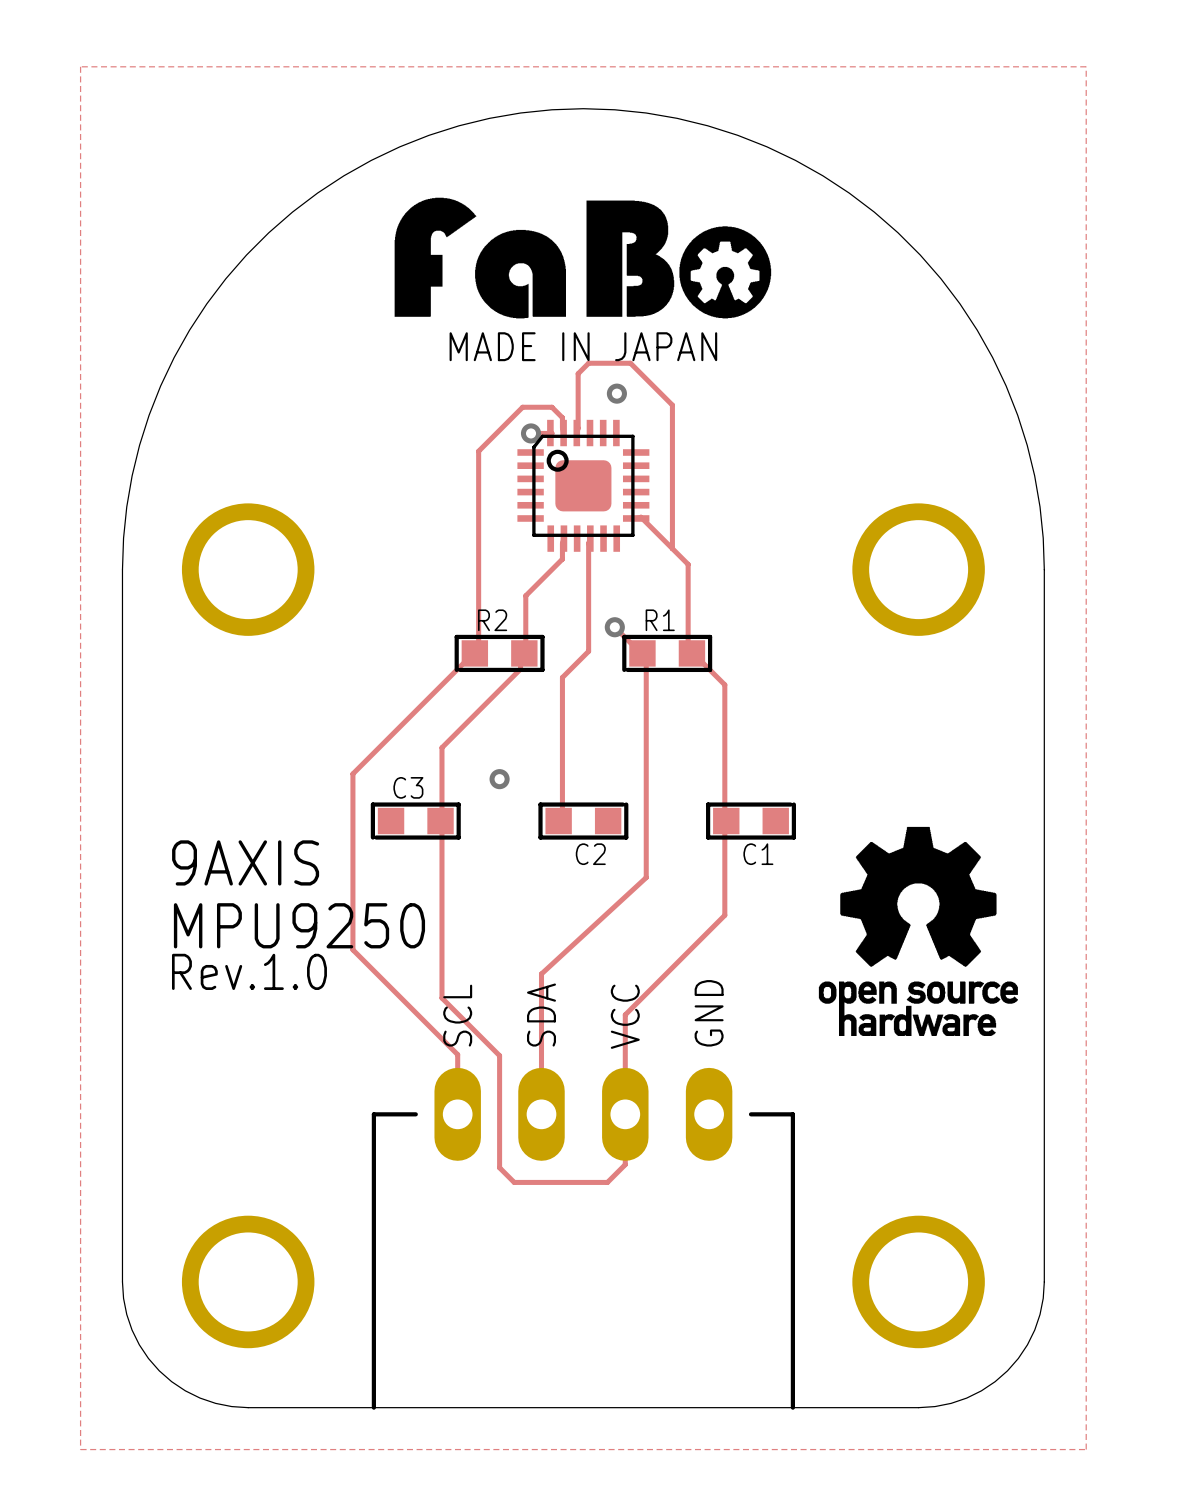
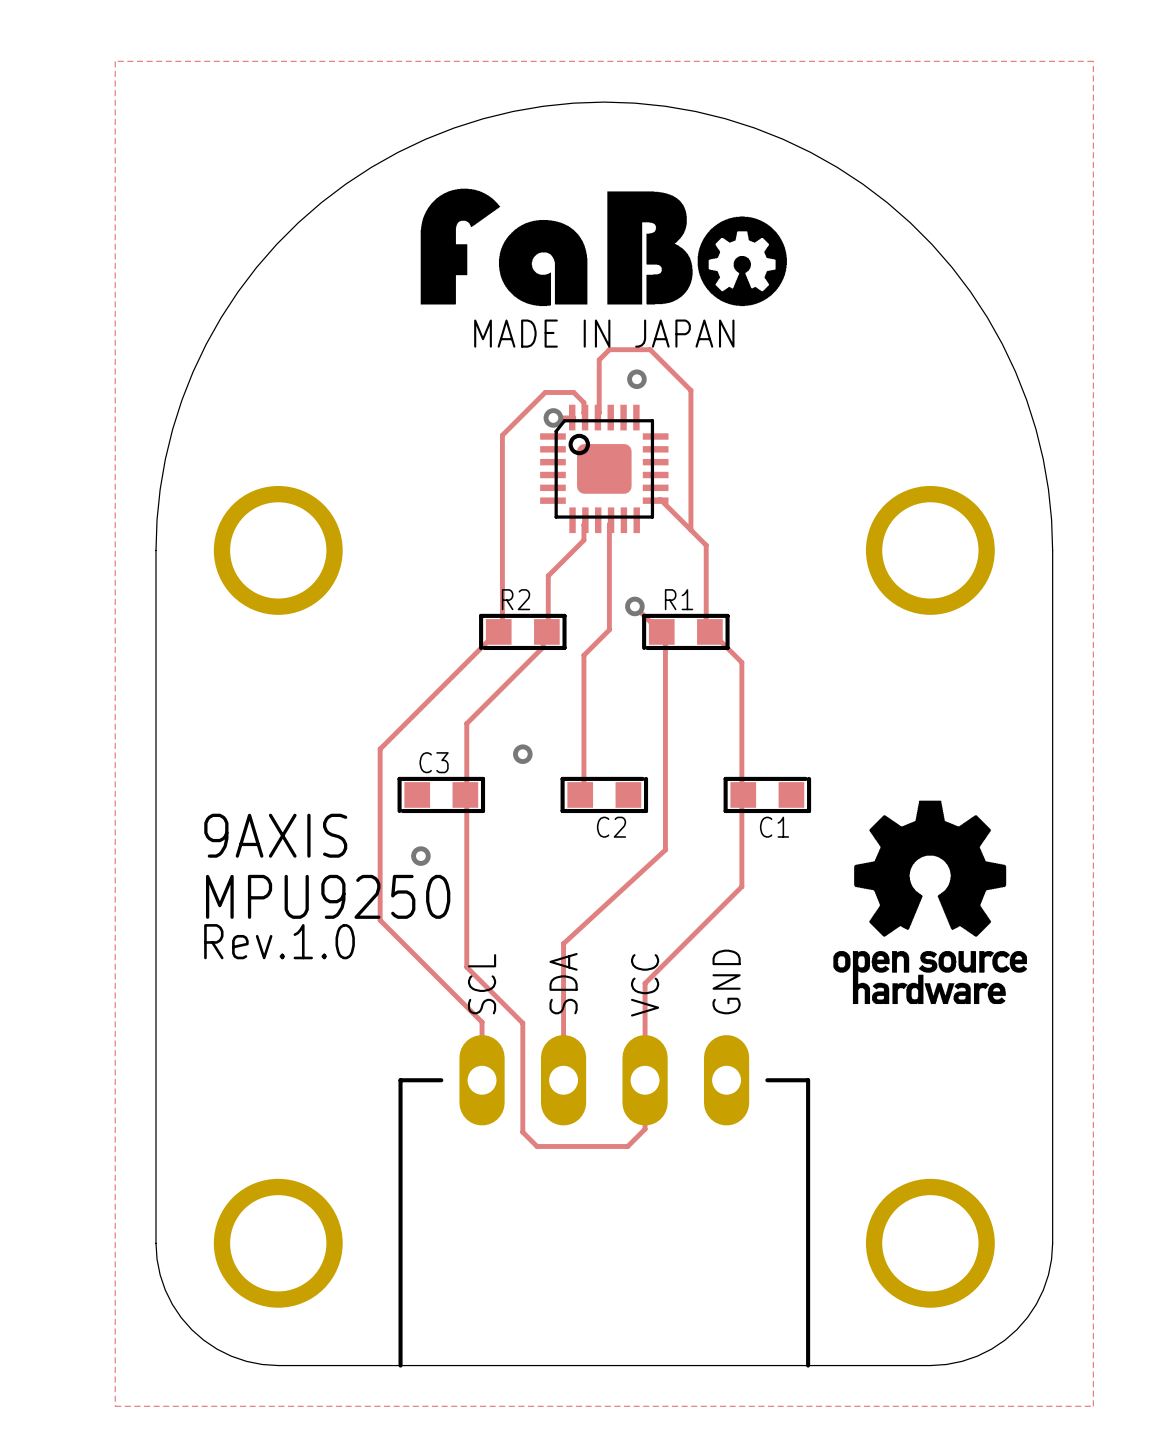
via: none -> (420, 856)

